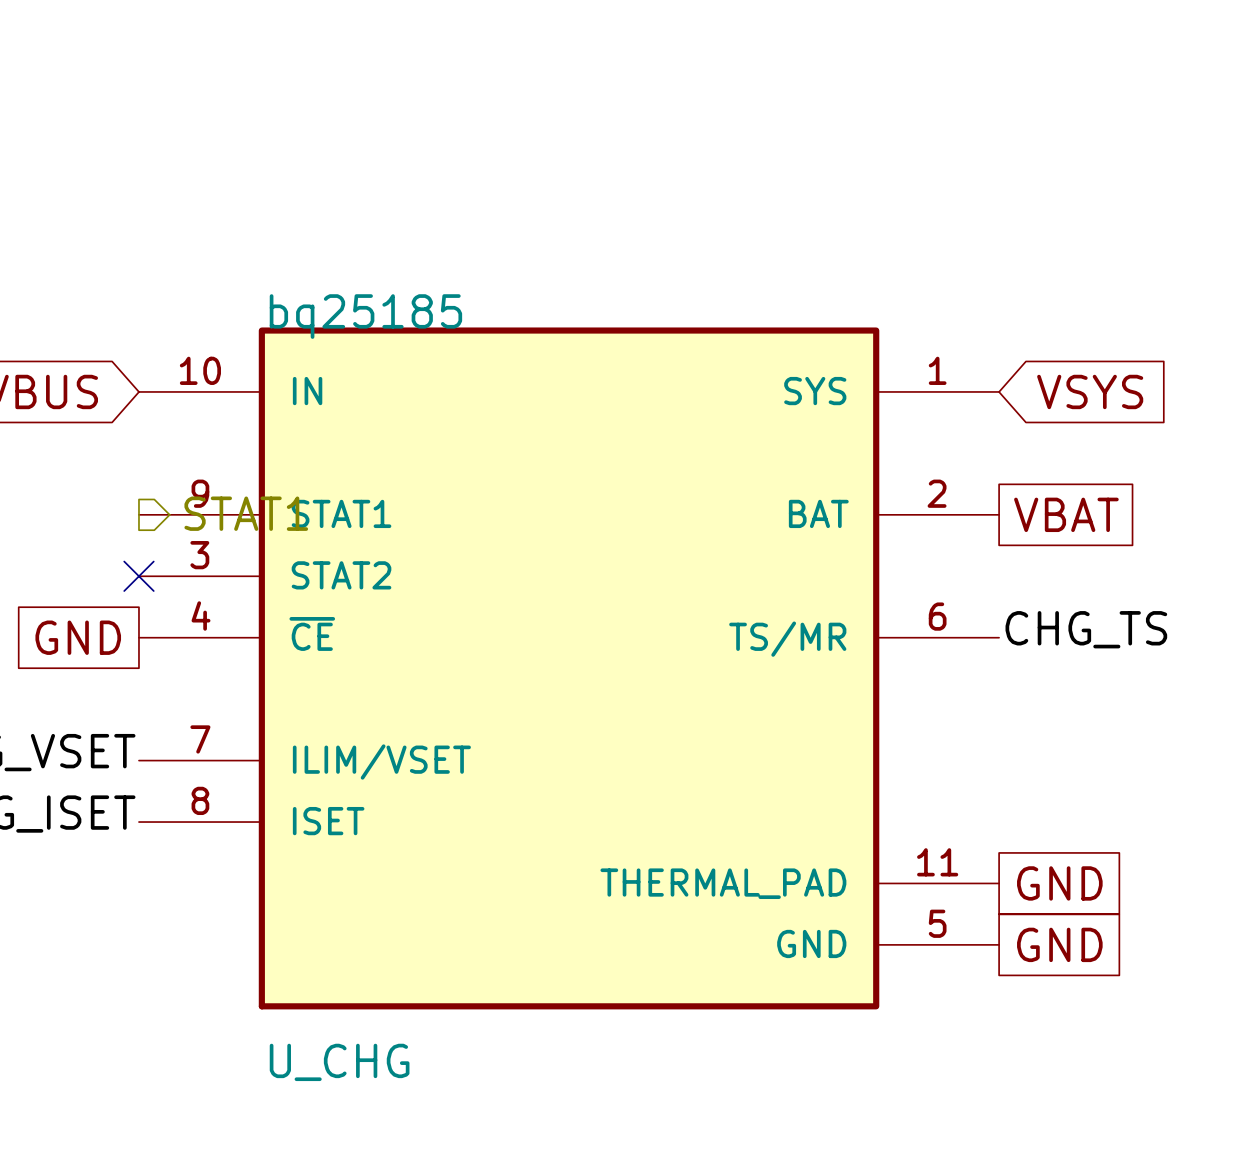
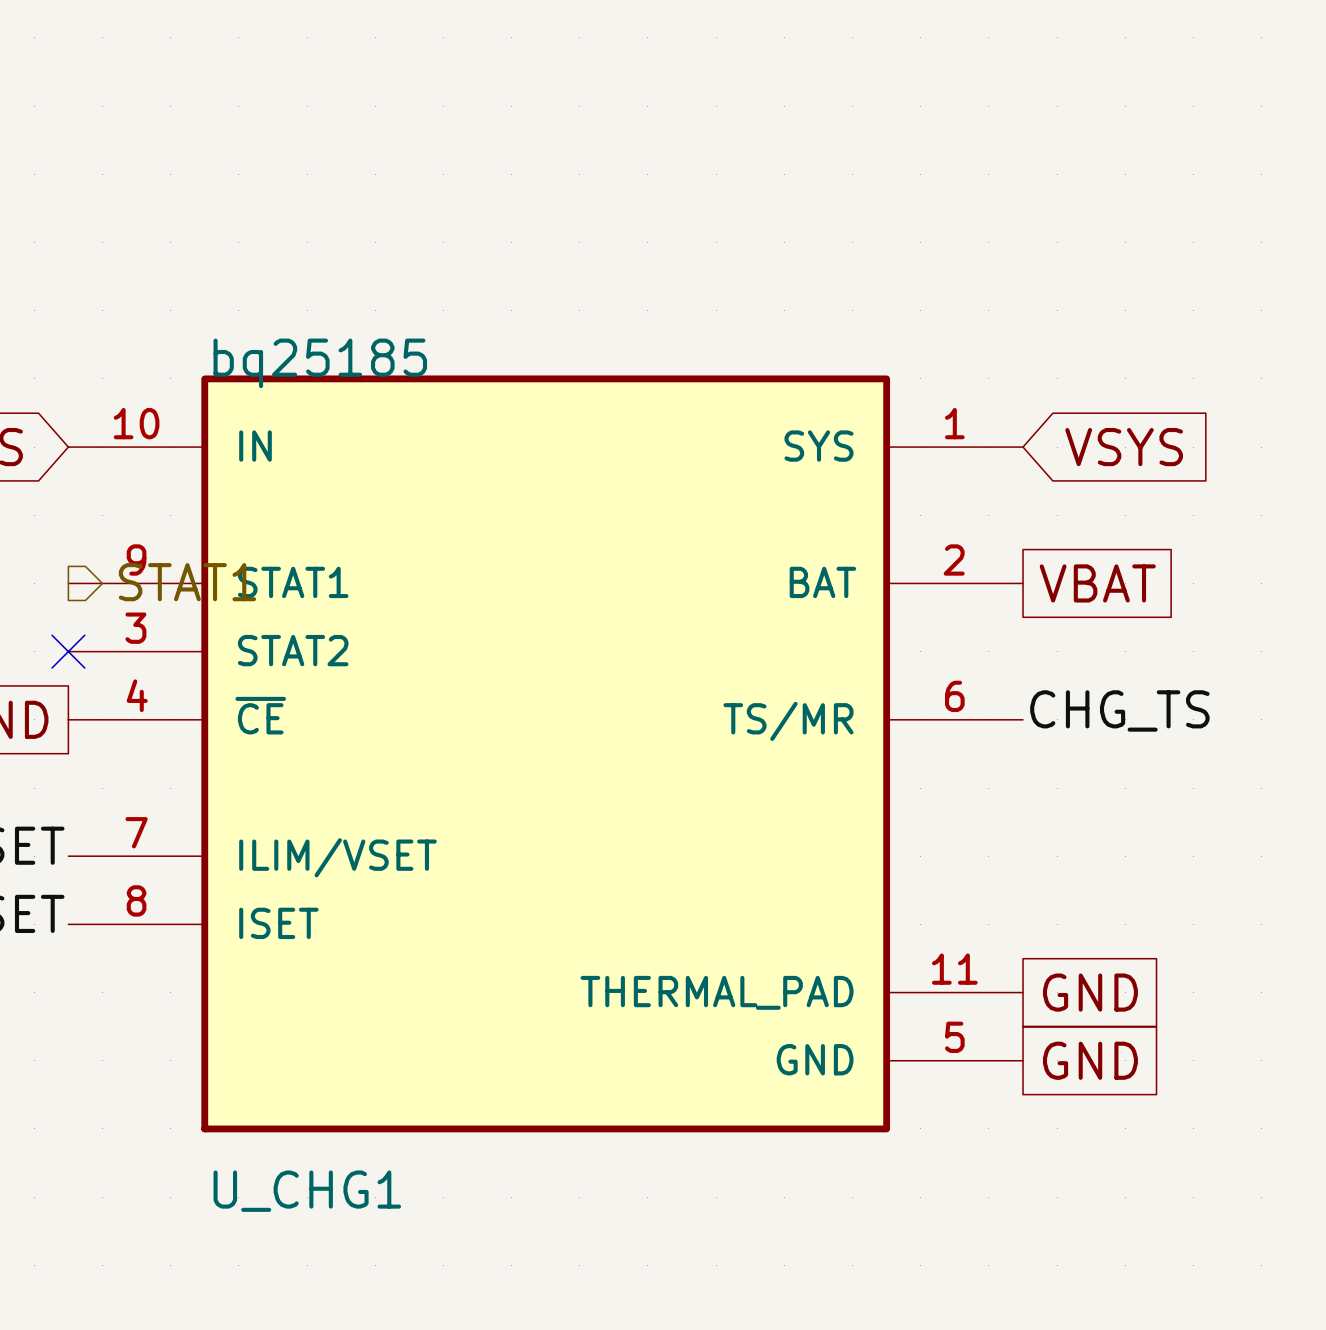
U_CHG name: U_CHG (339, 1062) -> U_CHG1 (307, 1191)

